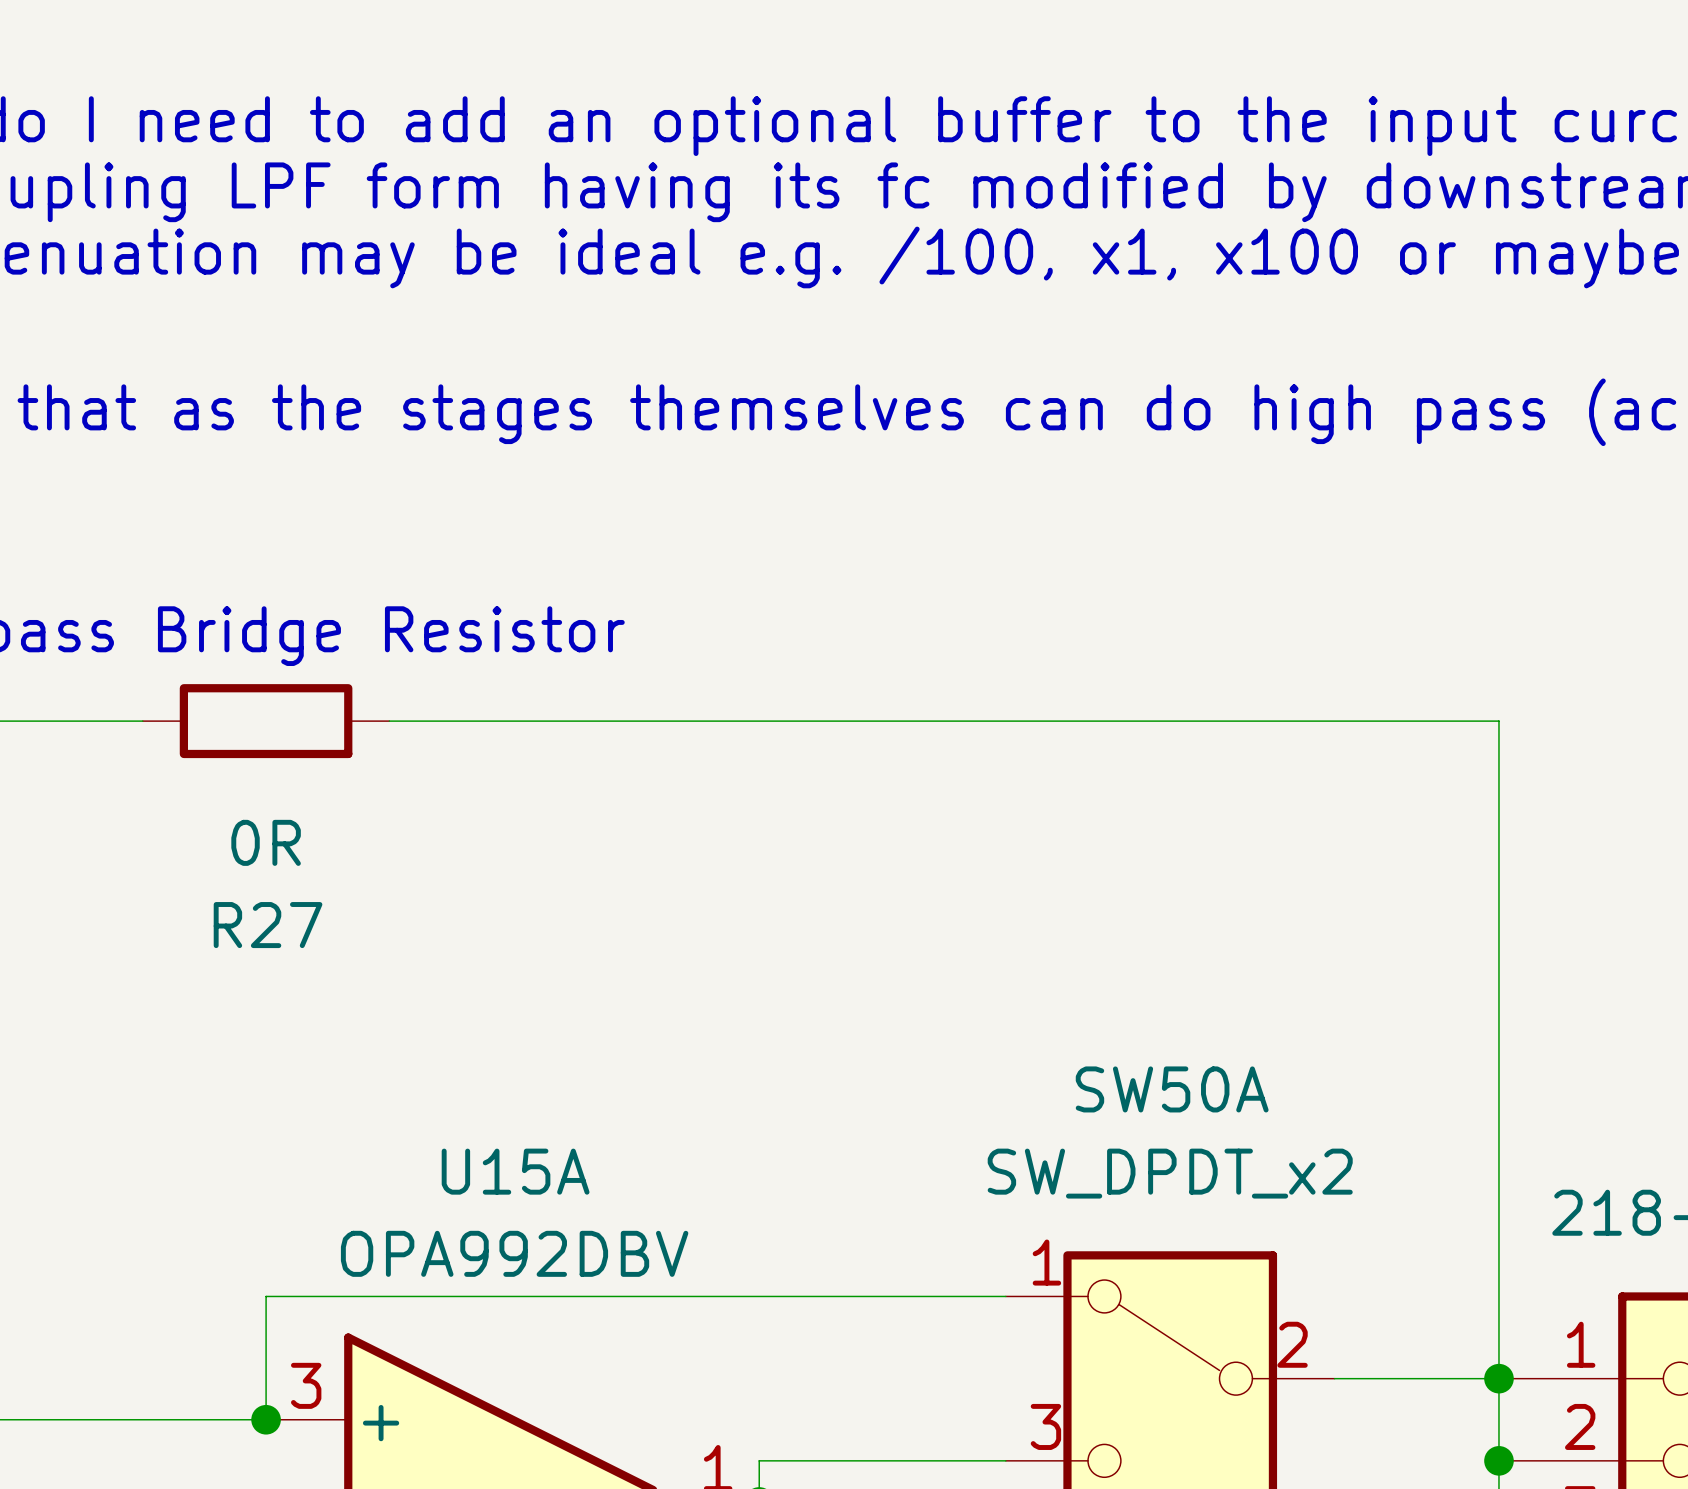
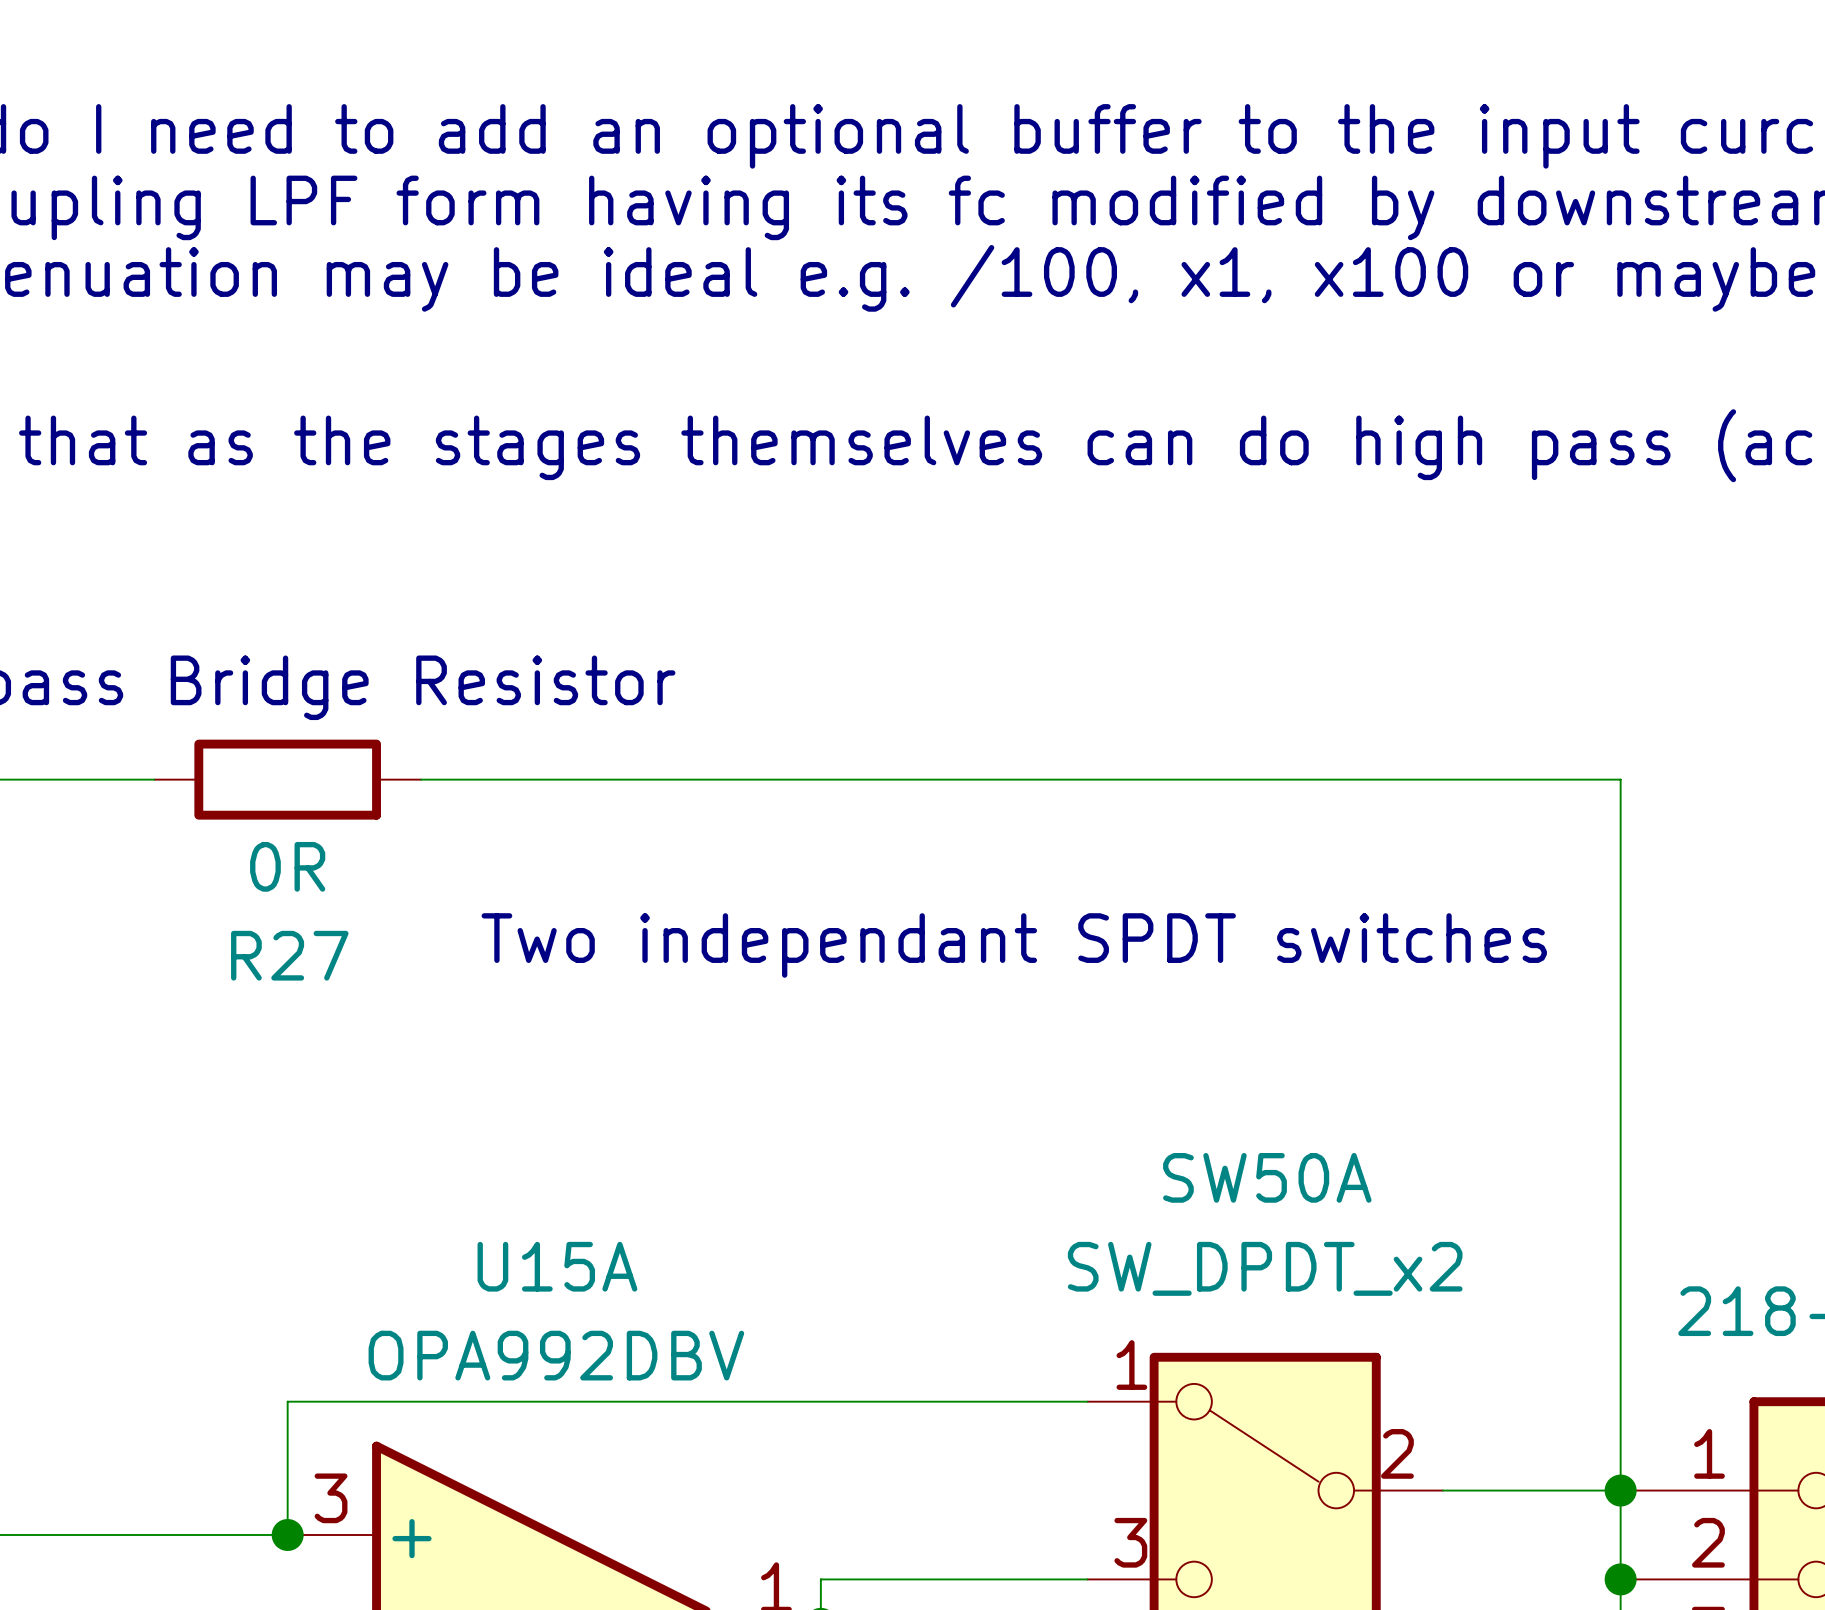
R27 value position: 0R (266, 842) -> 0R (287, 866)
text: none -> Two independant SPDT switches (1014, 945)
R27 name position: R27 (268, 925) -> R27 (289, 955)

